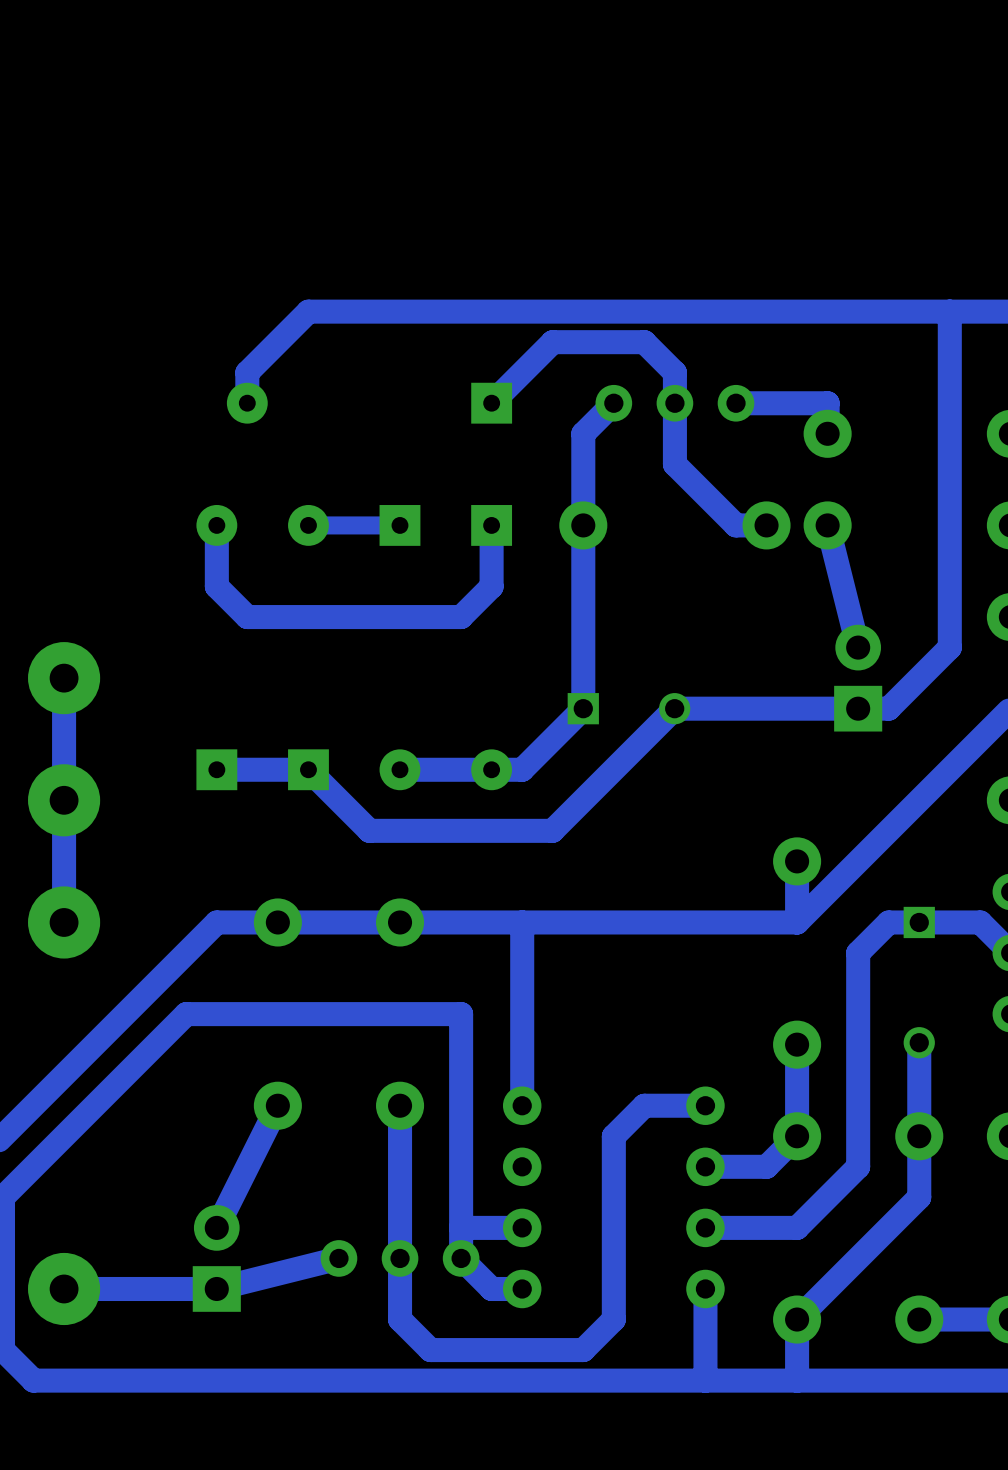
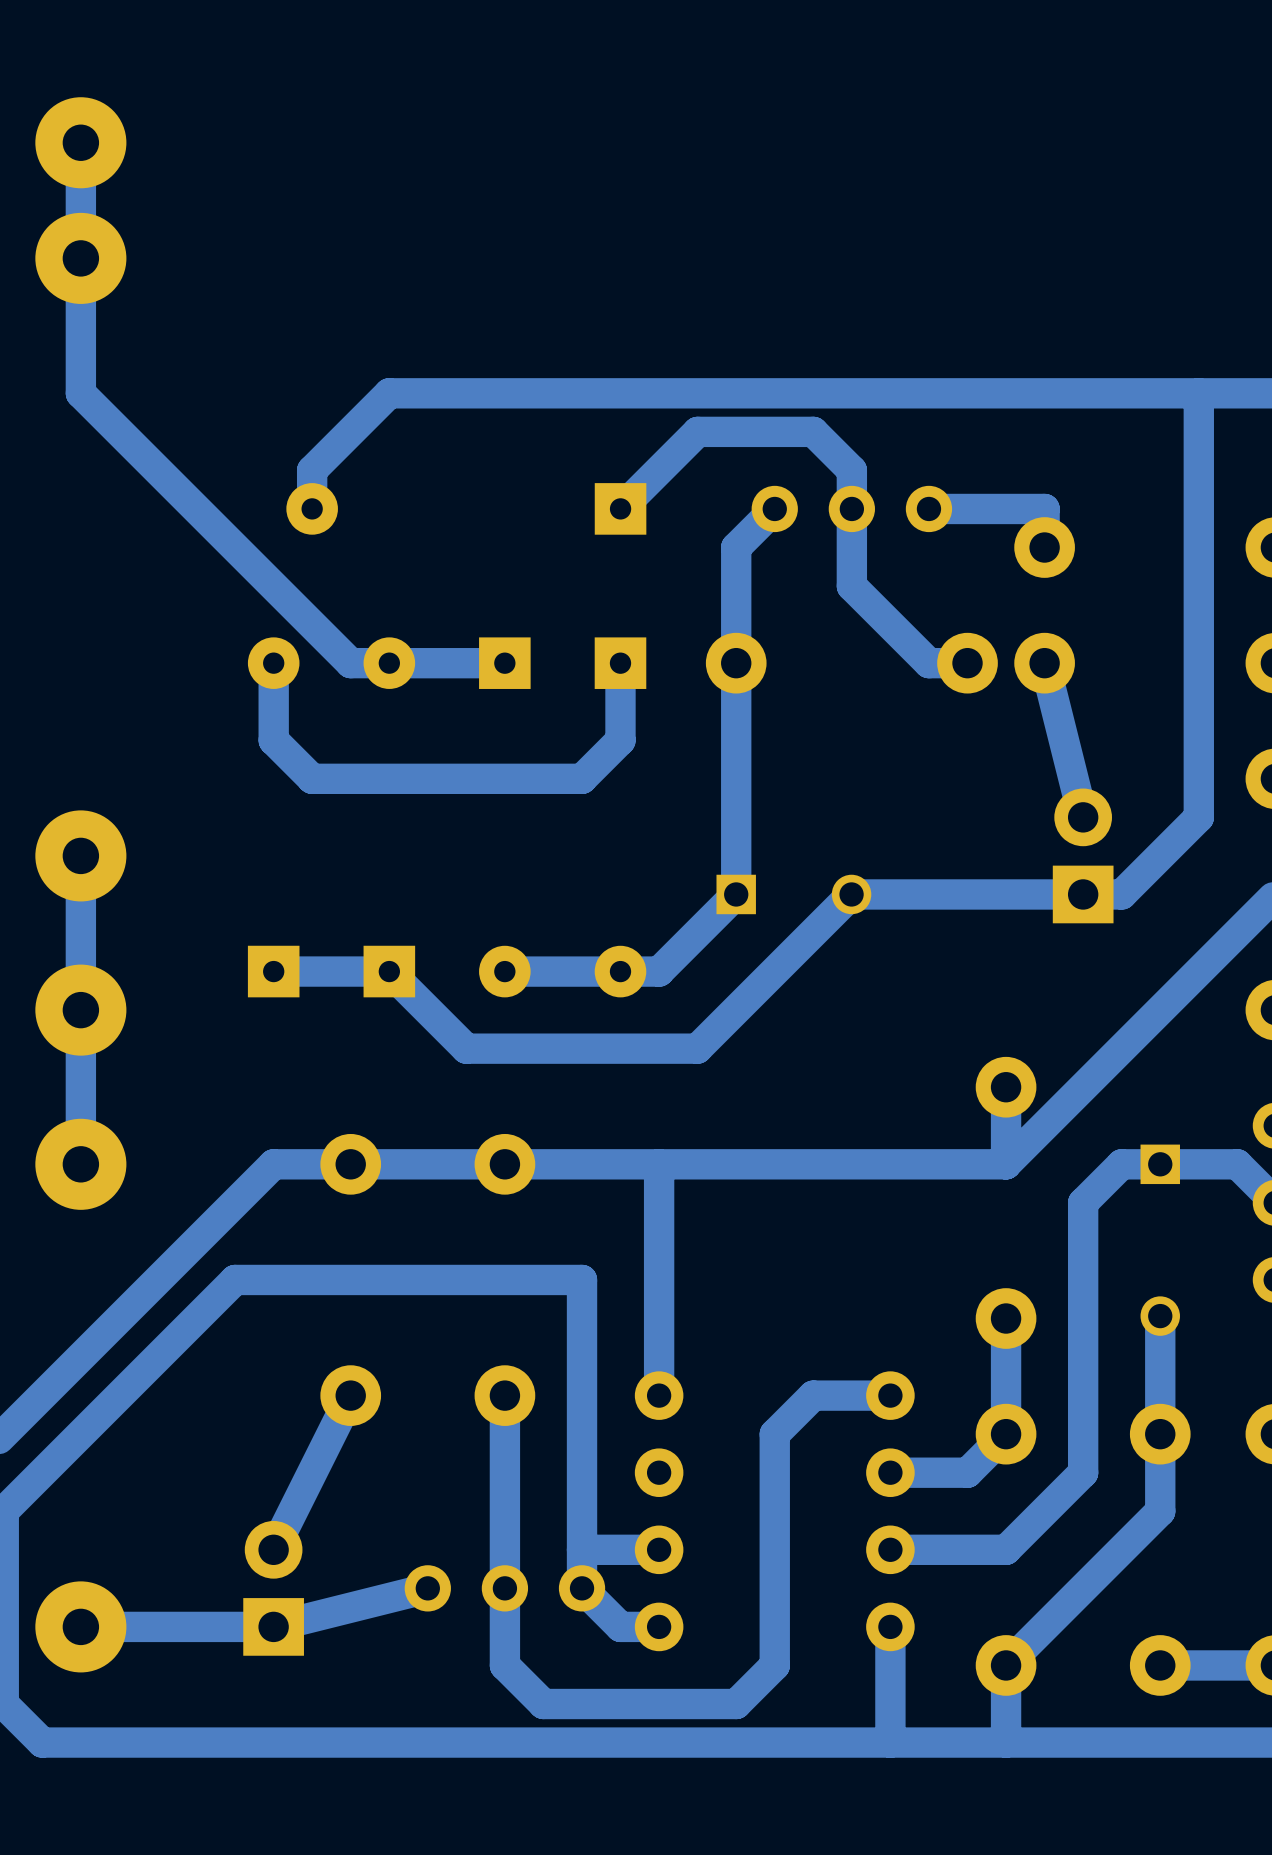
part: none -> (80, 200)
track: (399, 525) (308, 525) -> (504, 663) (350, 663) (80, 393) (80, 142)

